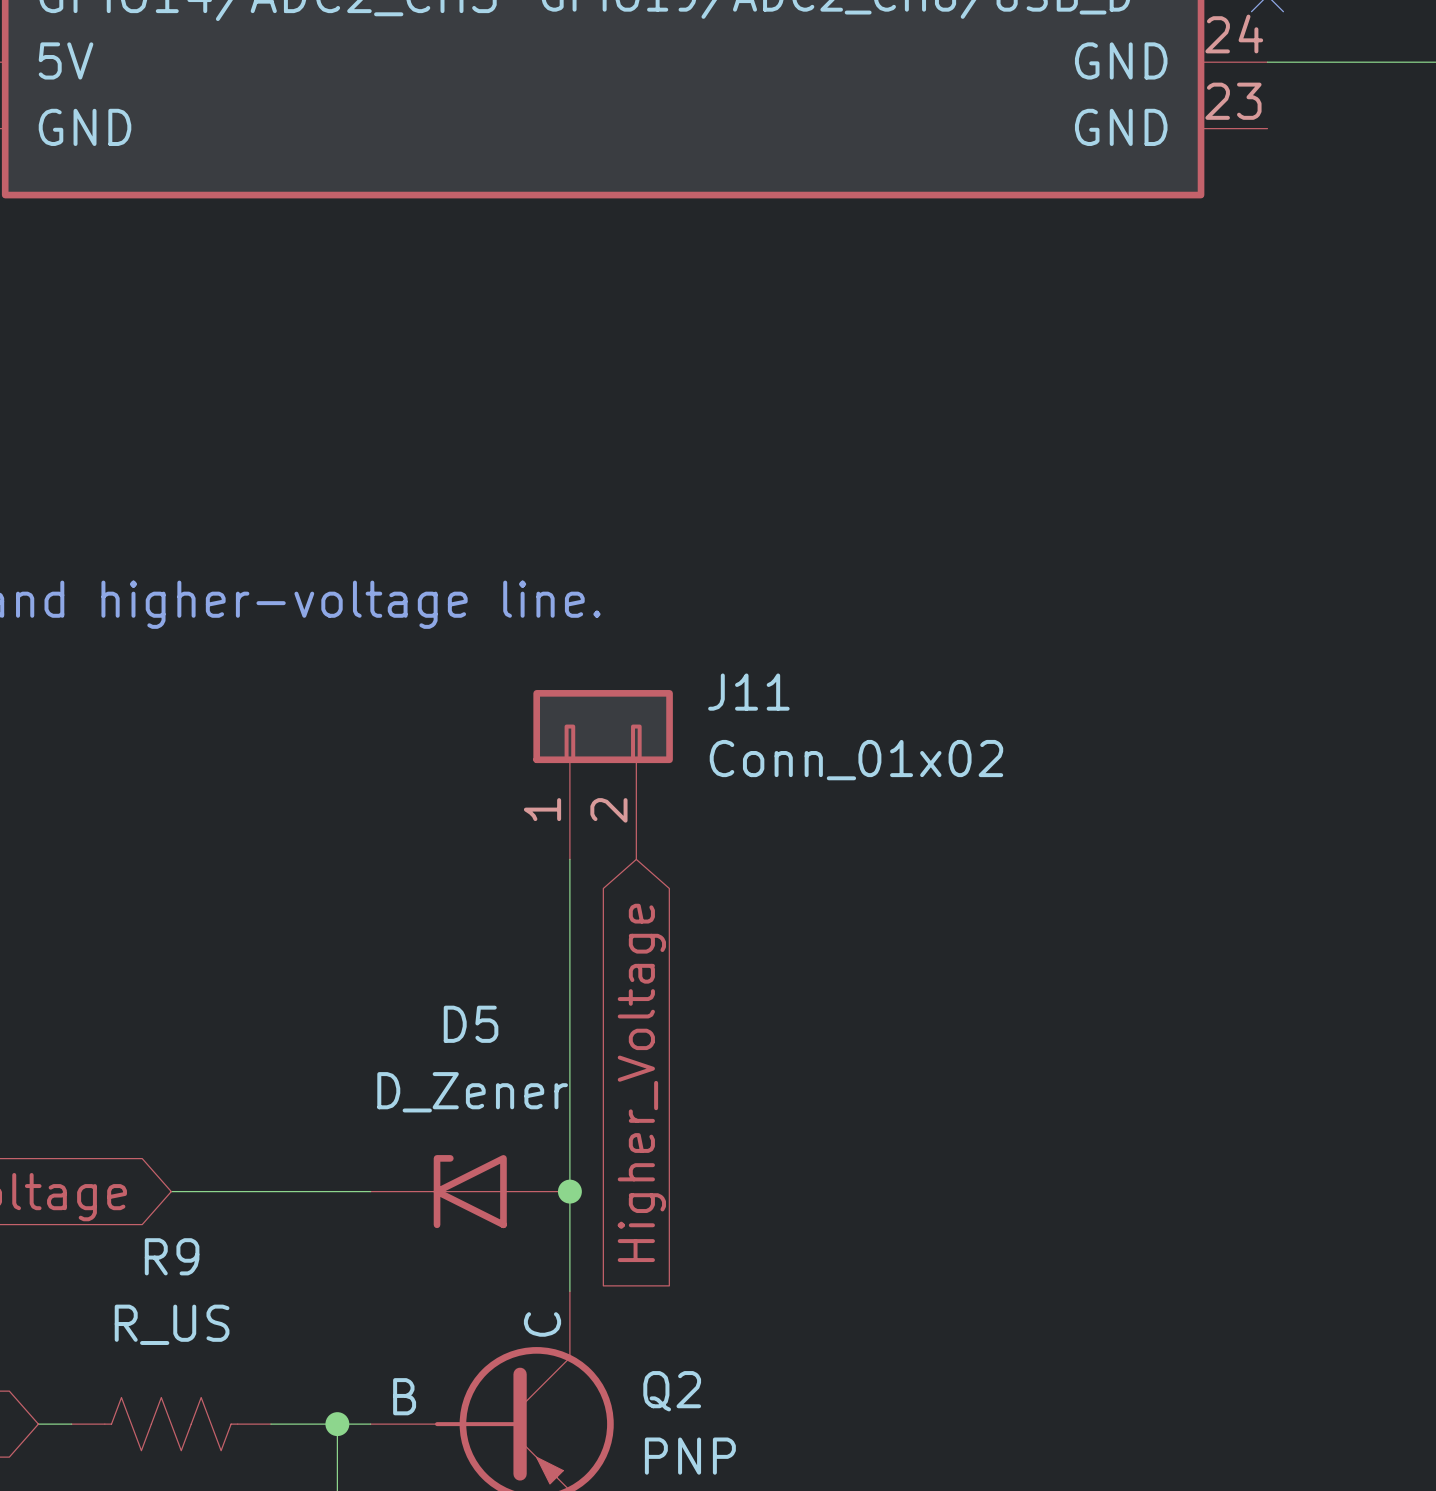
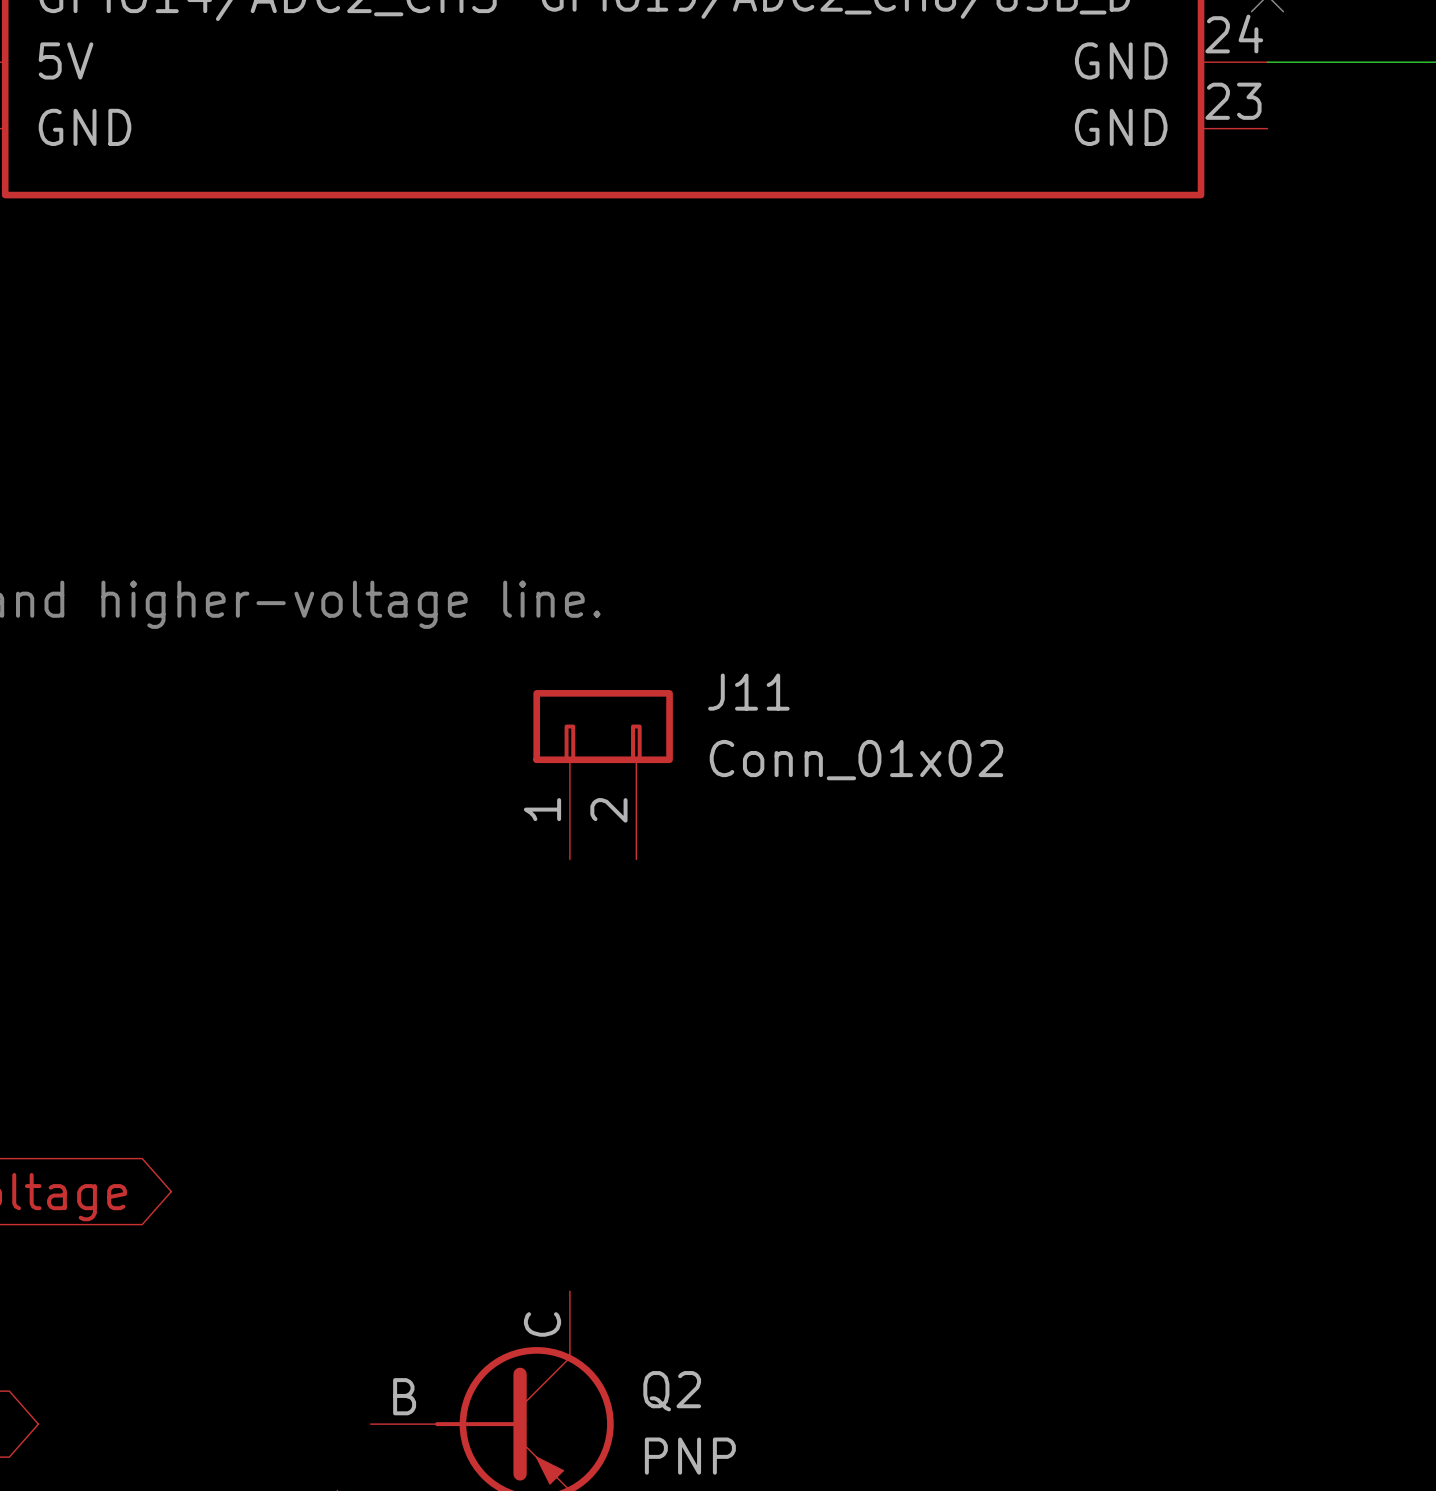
wire: (569, 859) (569, 1291) -> none
global label: Higher_Voltage (641, 1082) -> none
wire: (171, 1191) (370, 1191) -> none
D5: D_Zener (470, 1191) -> none
junction: (569, 1191) -> none
wire: (38, 1424) (71, 1424) -> none
R9: R_US (171, 1424) -> none
wire: (270, 1424) (370, 1424) -> none
wire: (337, 1424) (337, 1490) -> none
junction: (337, 1424) -> none

